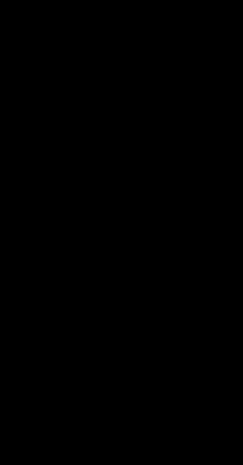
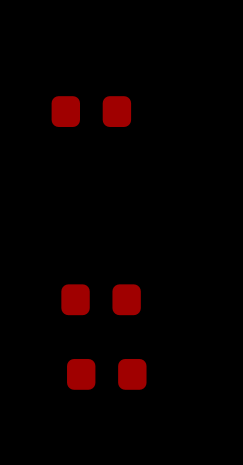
part: none -> (91, 111)
part: none -> (101, 299)
part: none -> (106, 374)

